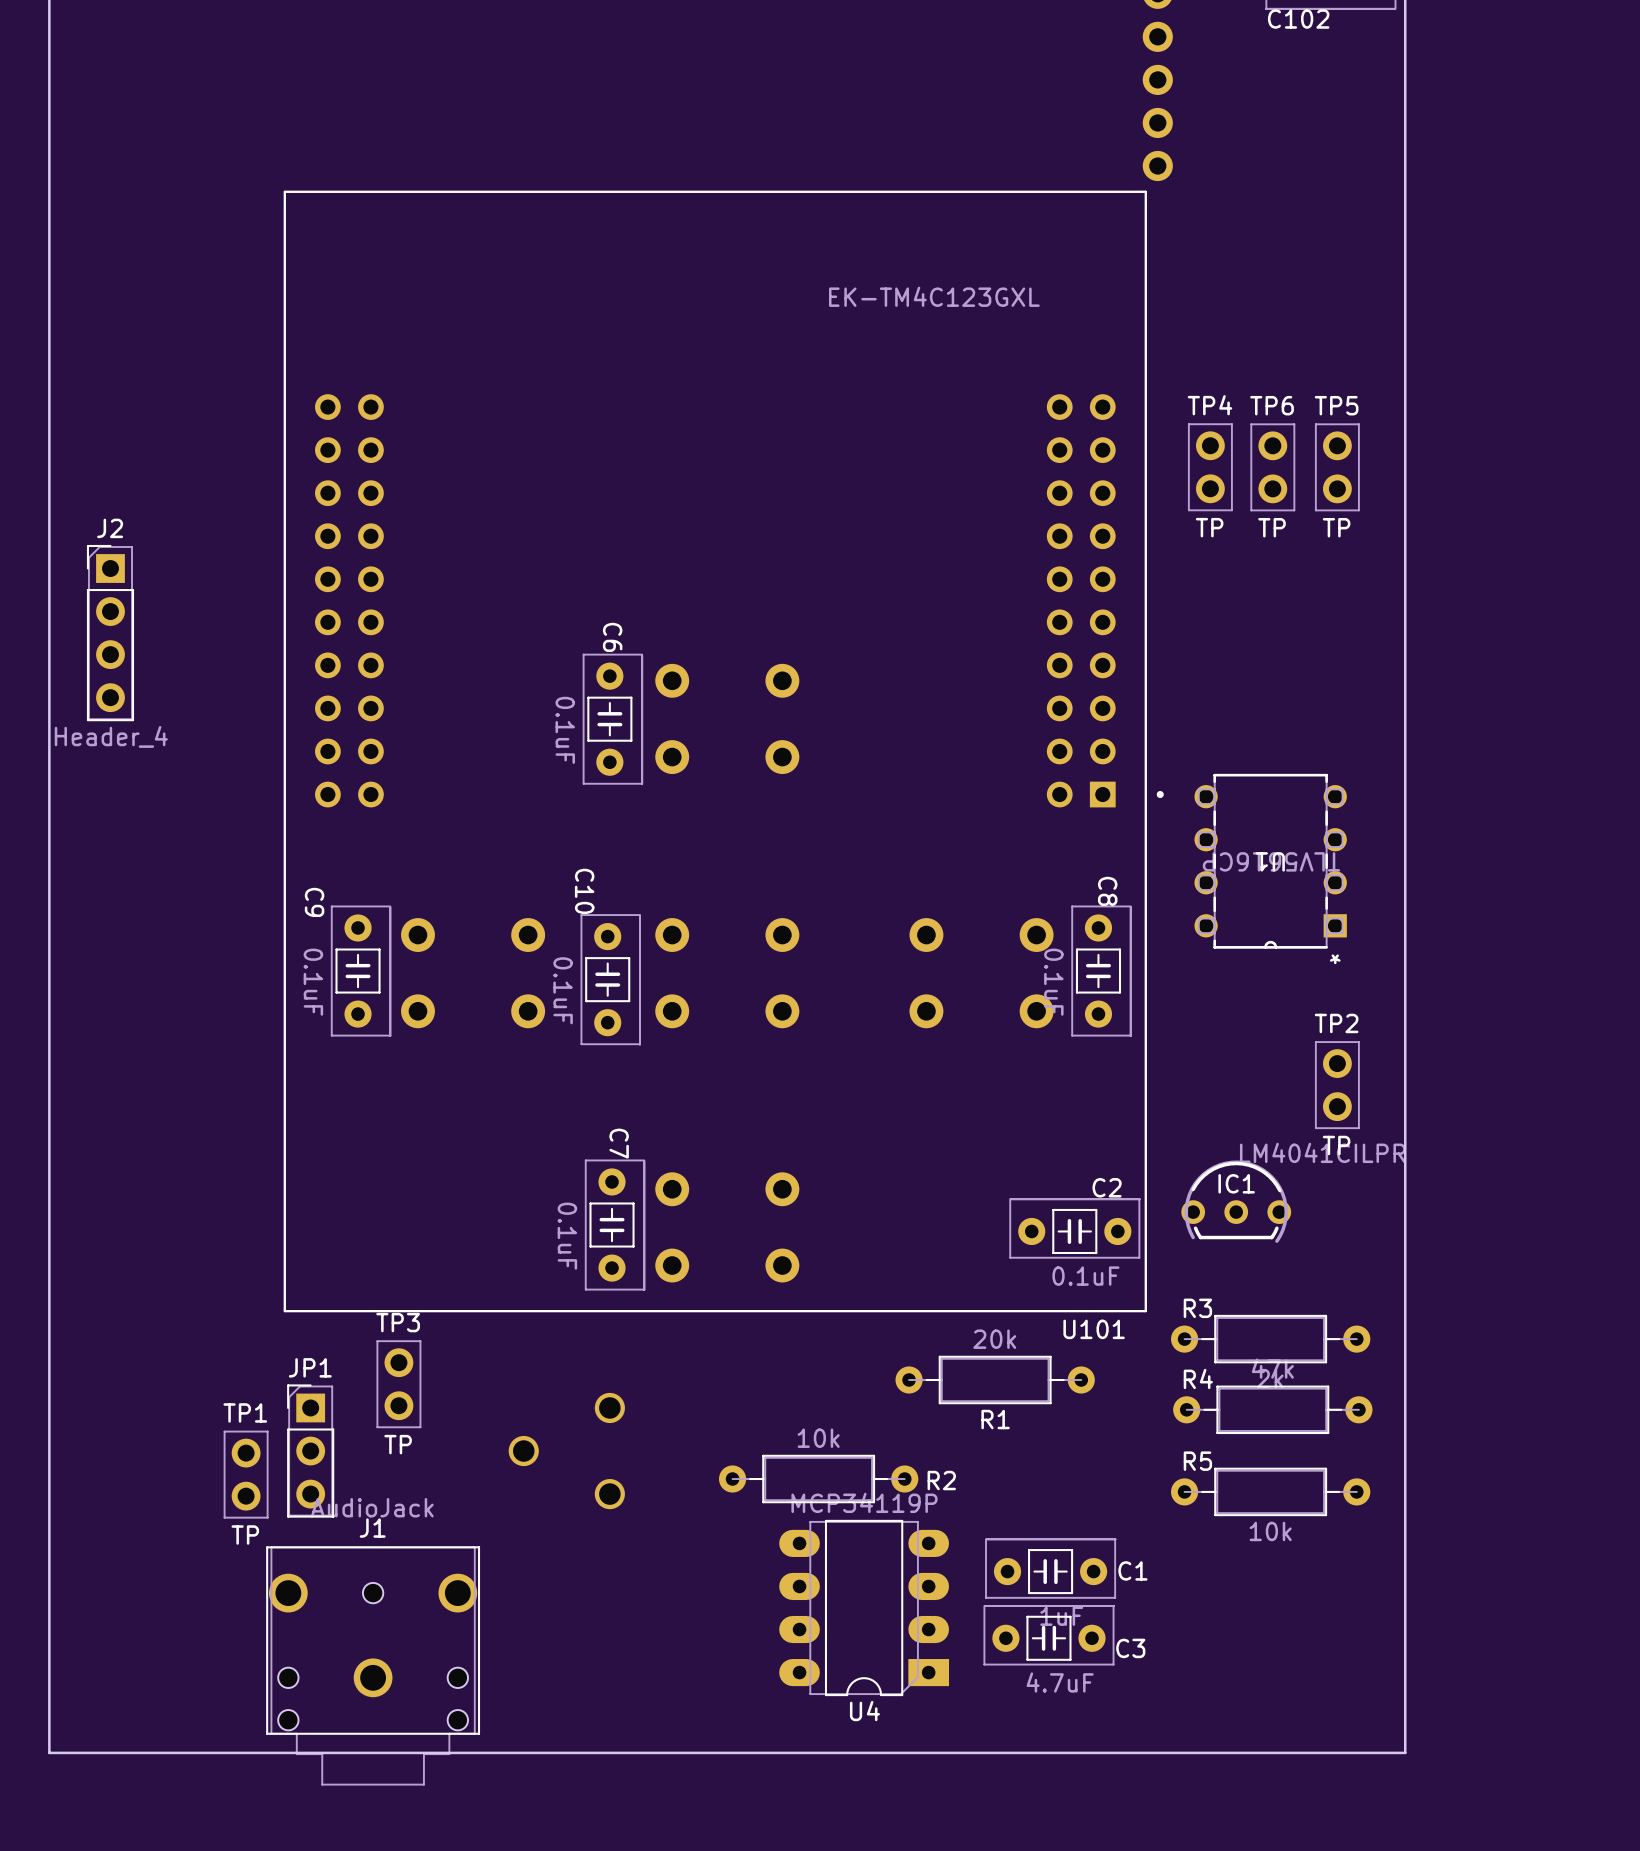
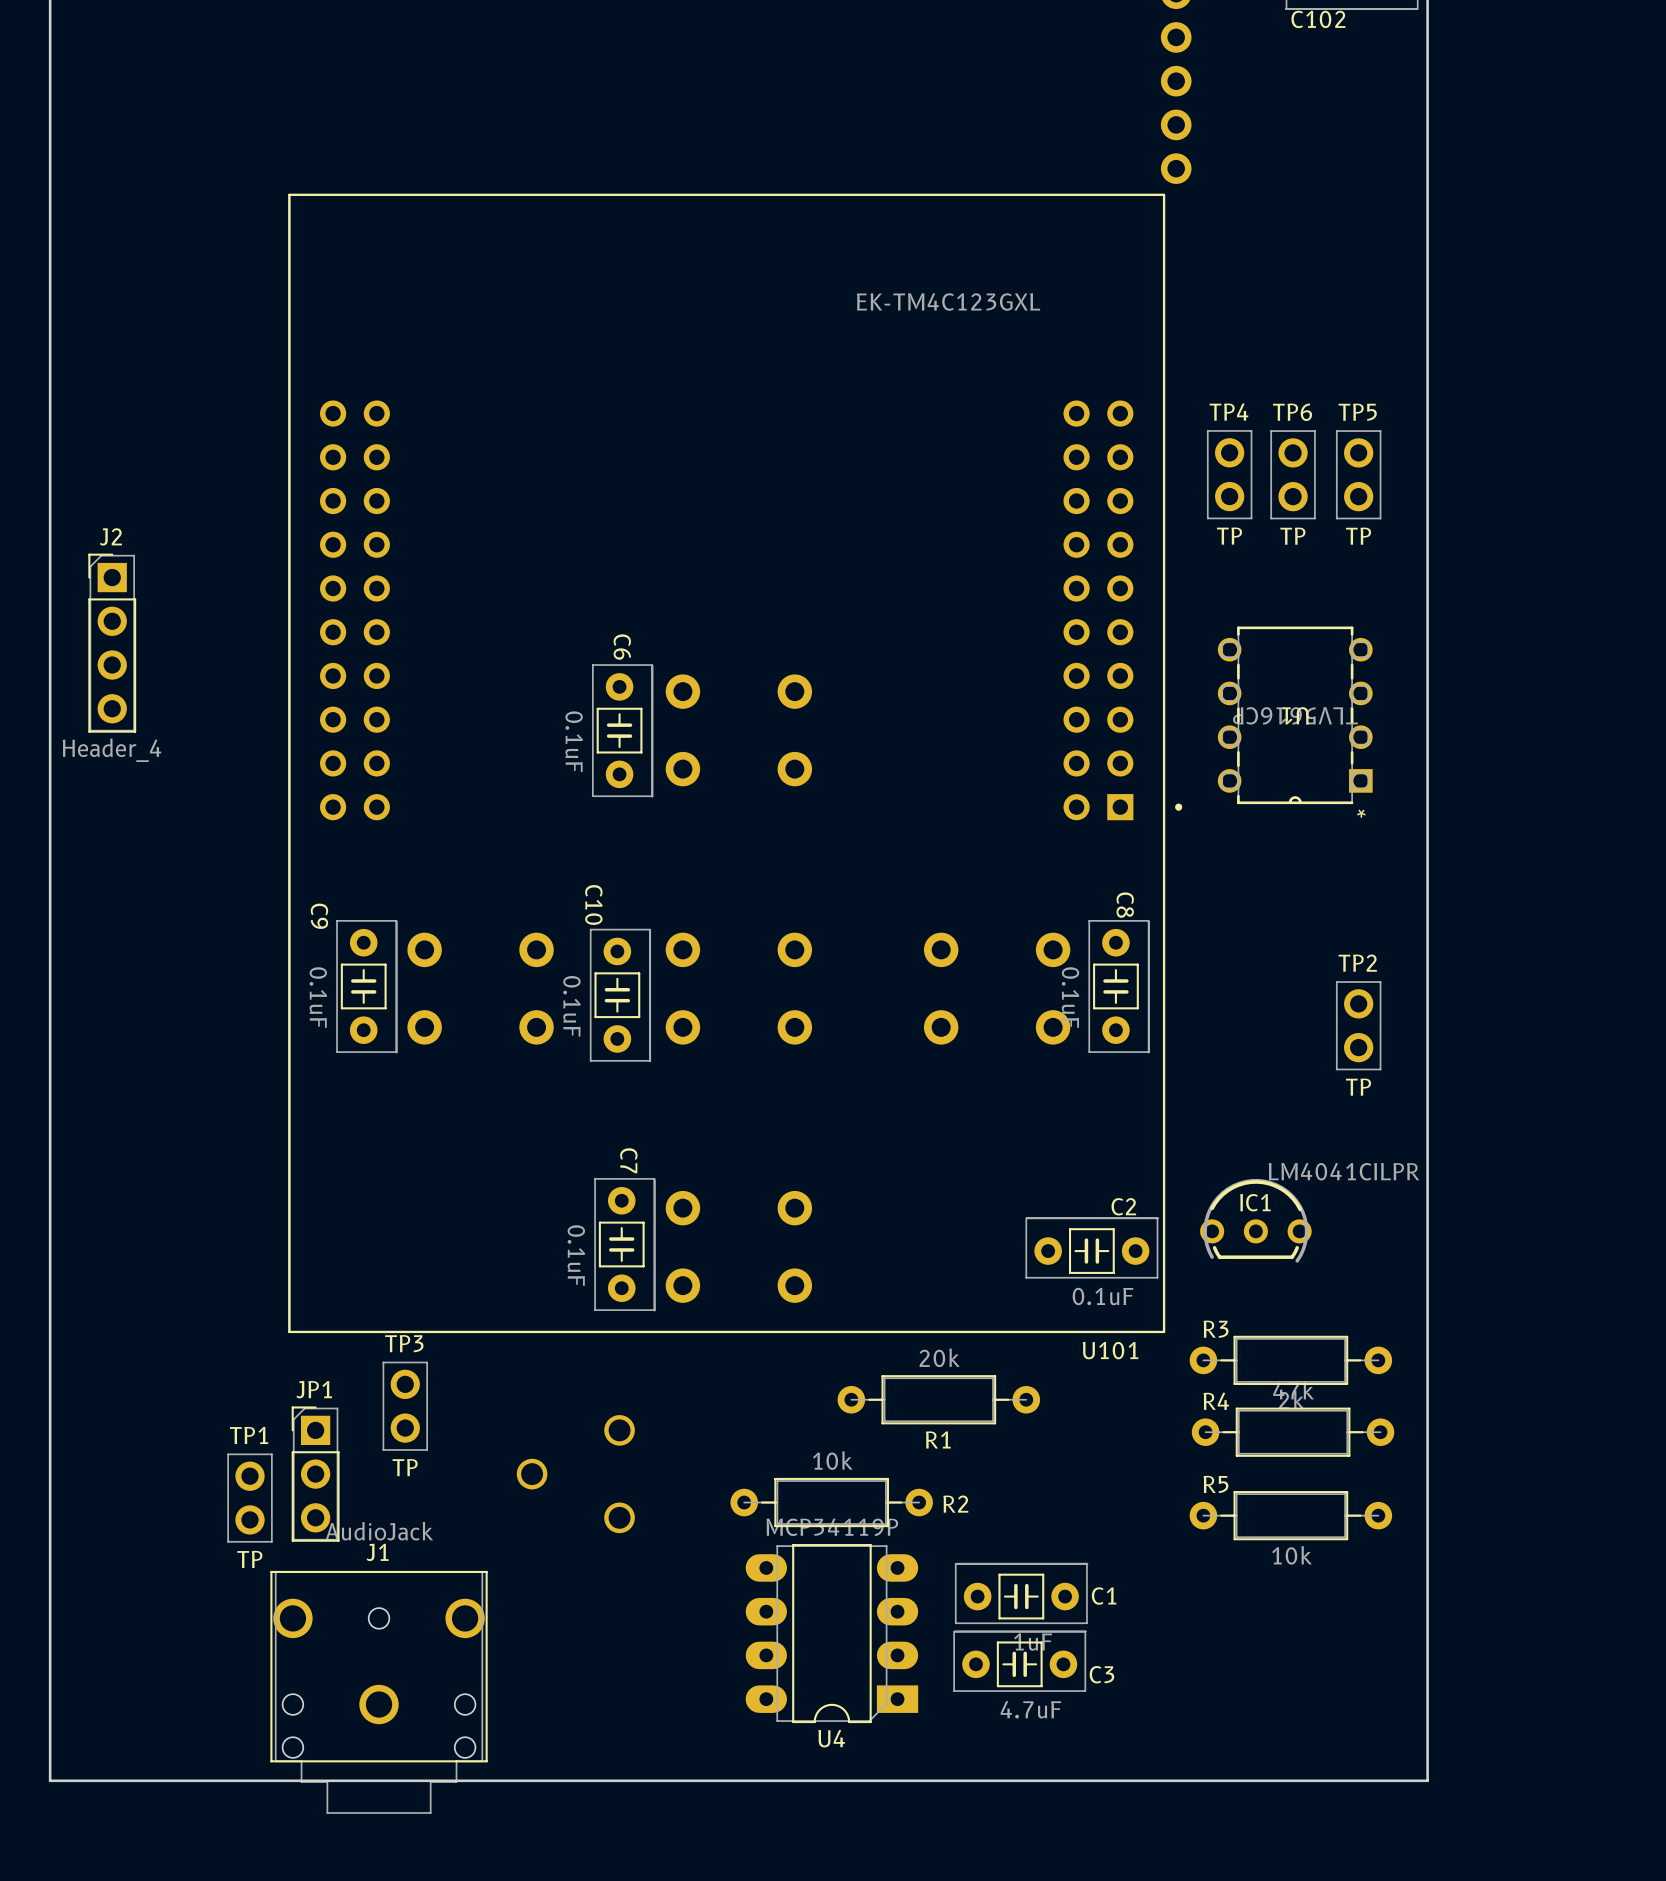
U1 position: (1270, 861) -> (1295, 715)
TP2 position: (1337, 1085) -> (1358, 1025)
R1 position: (995, 1379) -> (938, 1399)
C1 position: (1050, 1568) -> (1021, 1593)
U4 position: (864, 1607) -> (831, 1633)
C3 position: (1049, 1635) -> (1020, 1661)

